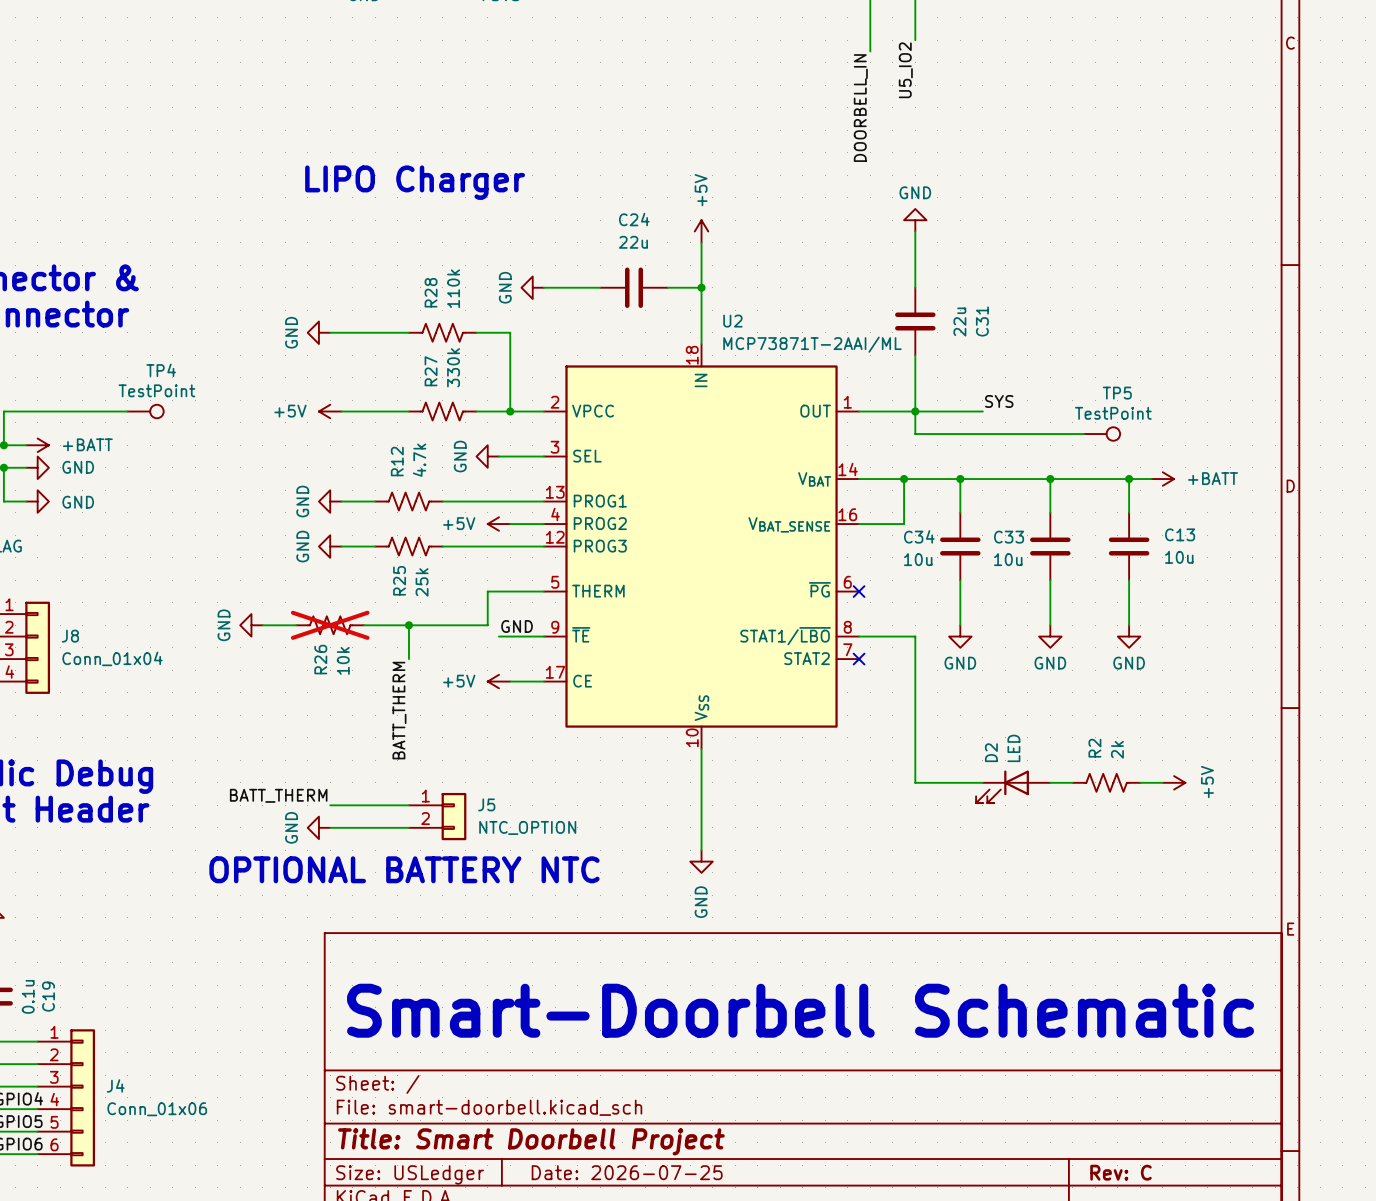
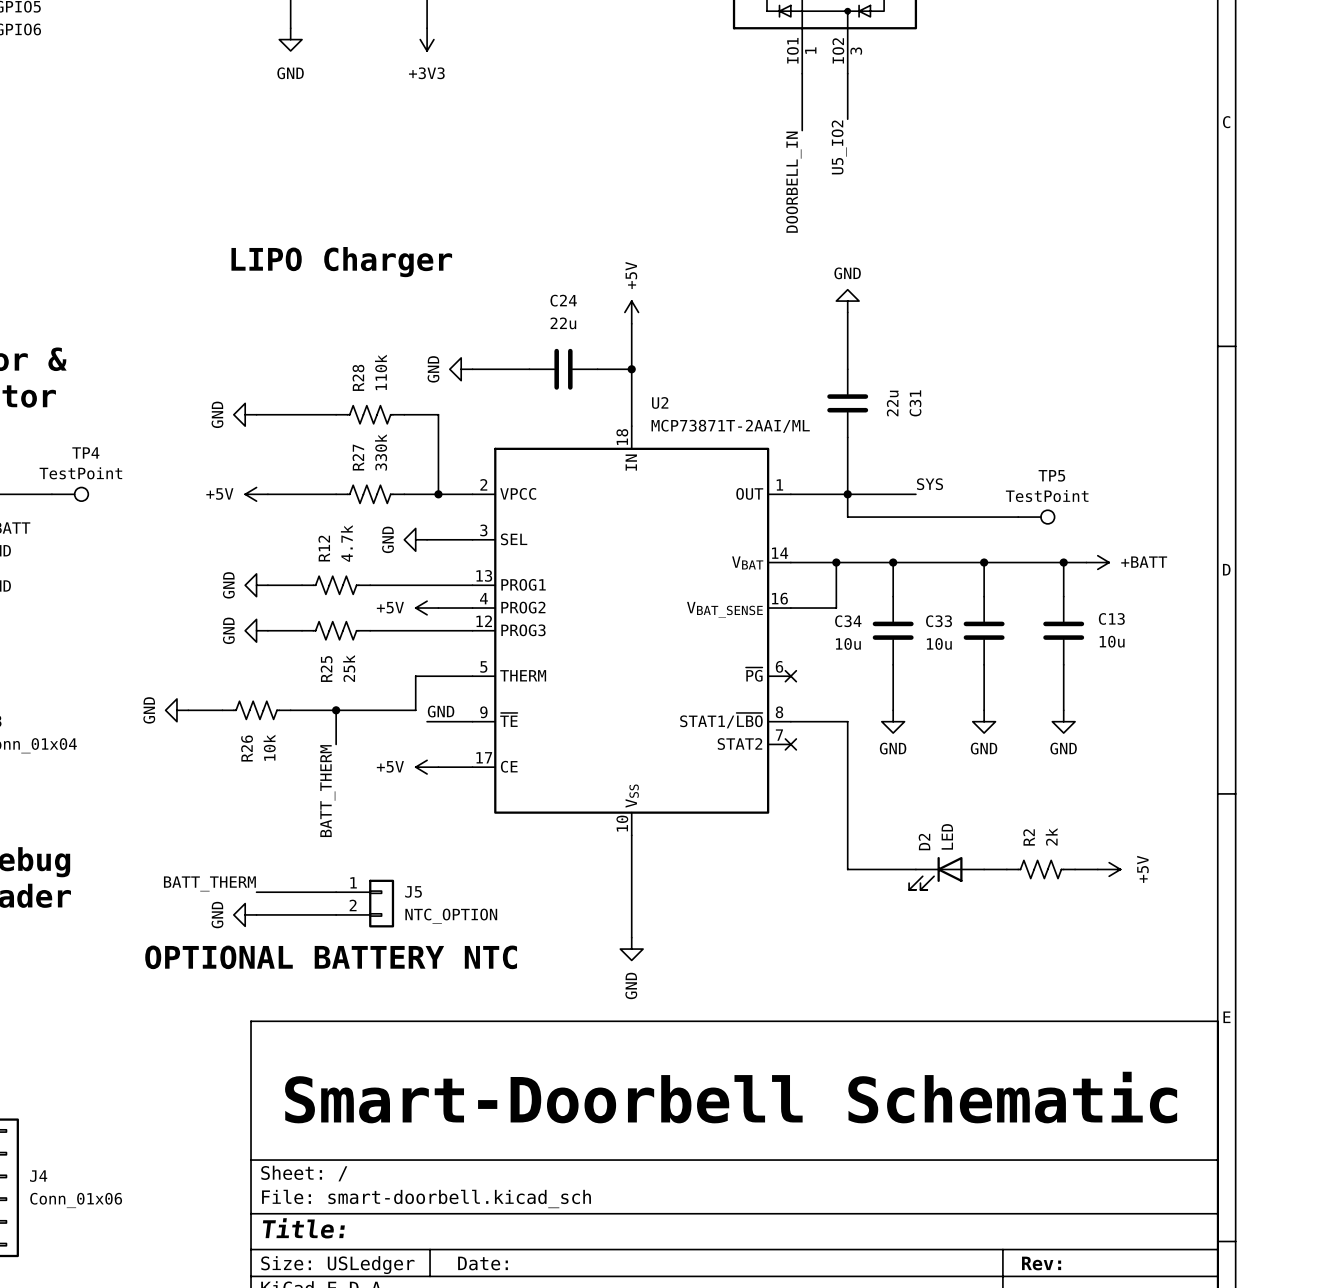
R26 do-not-place cross: (330, 625) -> none
title block: Title: Smart Doorbell Project (531, 1141) -> Title: (303, 1228)
title block: Date: 2026-07-25 (627, 1172) -> Date: (483, 1263)
title block: Rev: C (1121, 1172) -> Rev: (1041, 1263)

